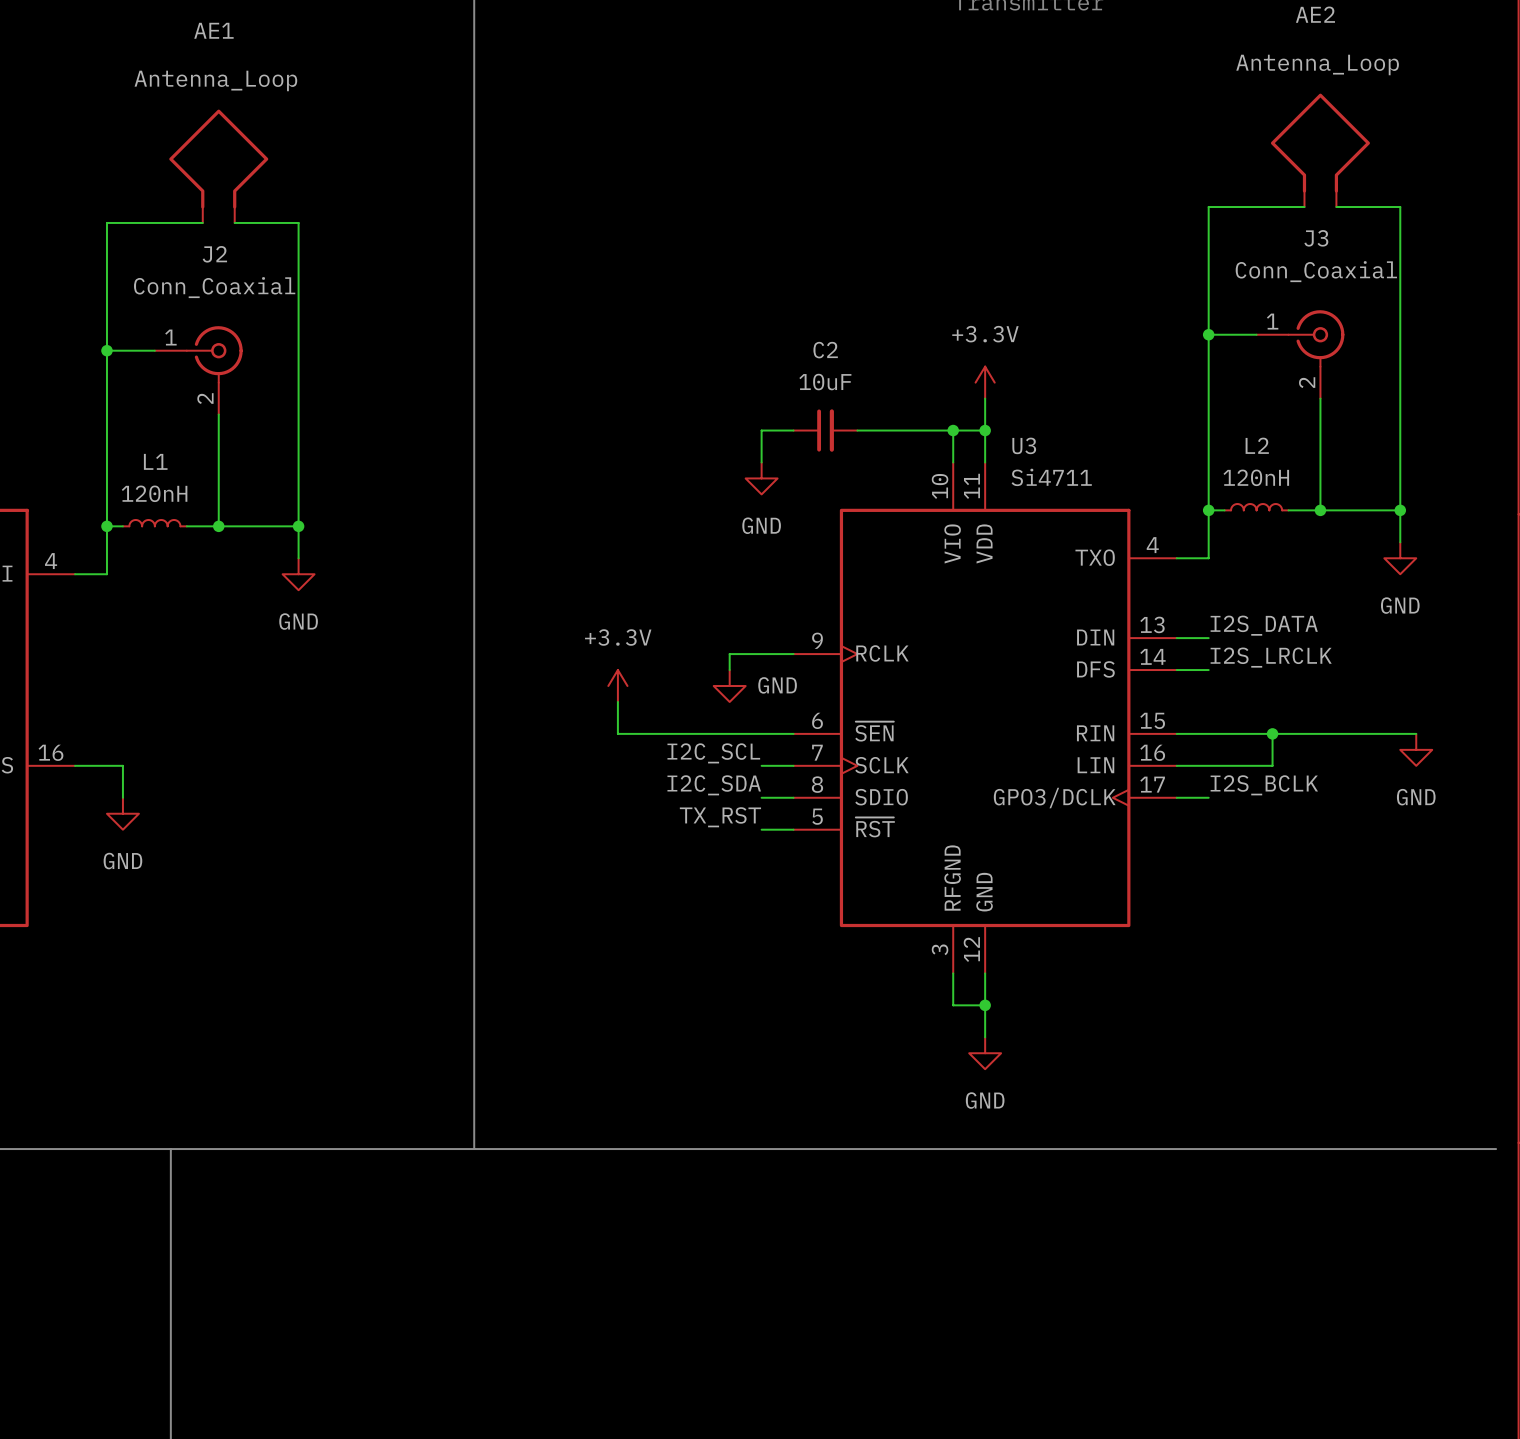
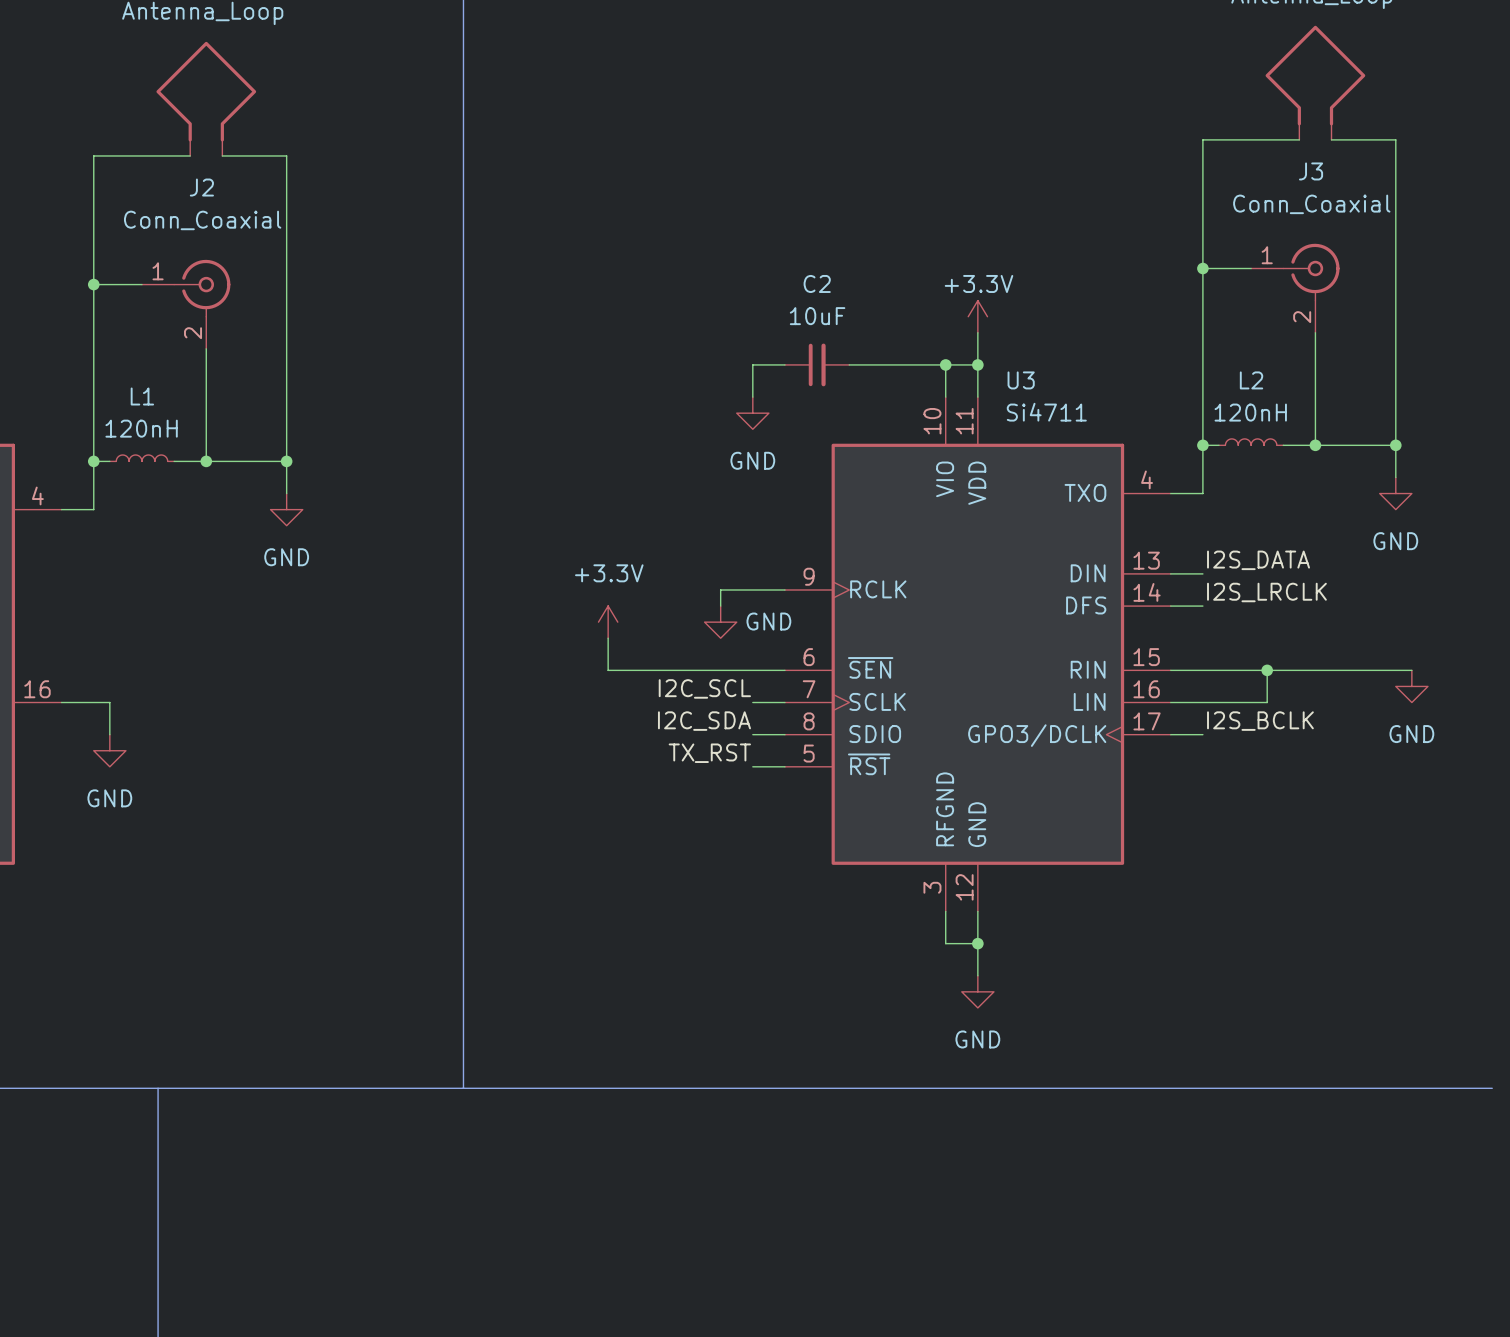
power symbol text position: +3.3V (985, 334) -> +3.3V (979, 283)

